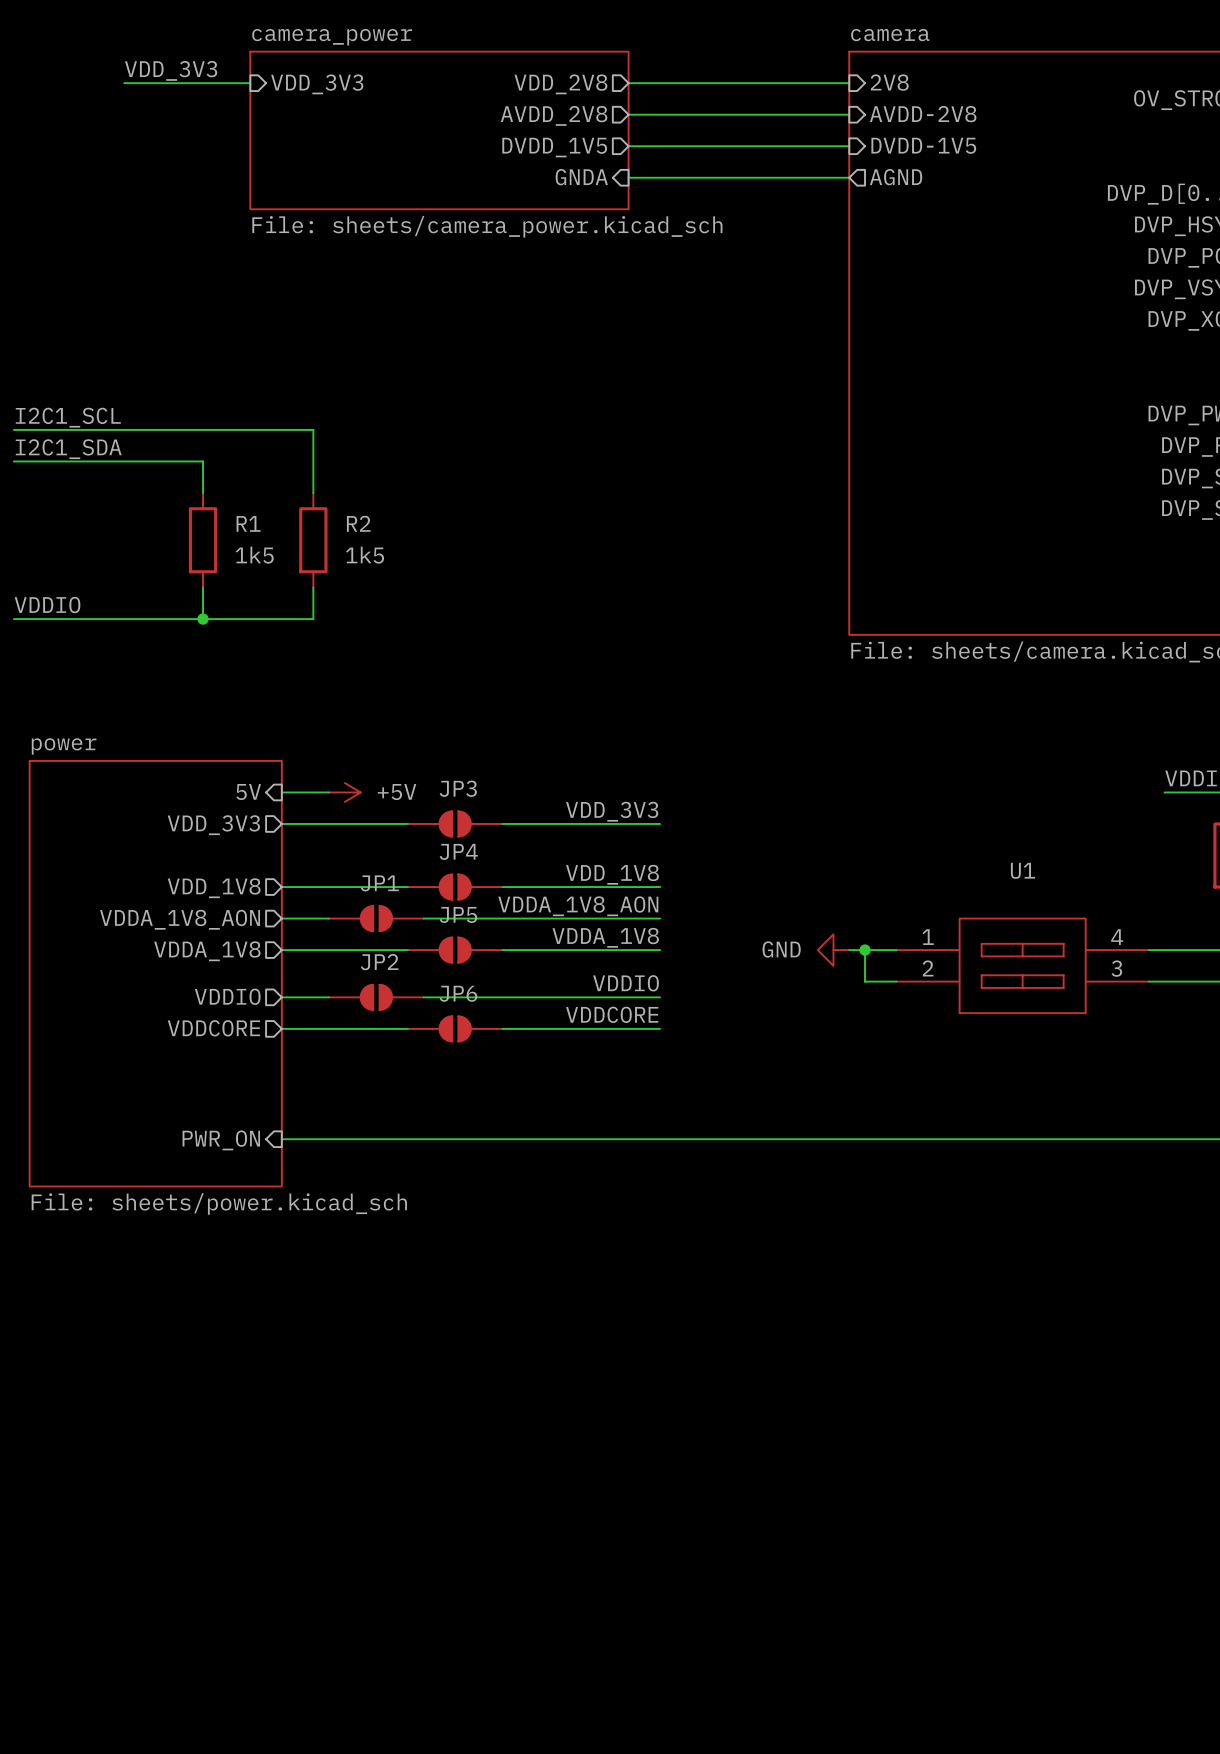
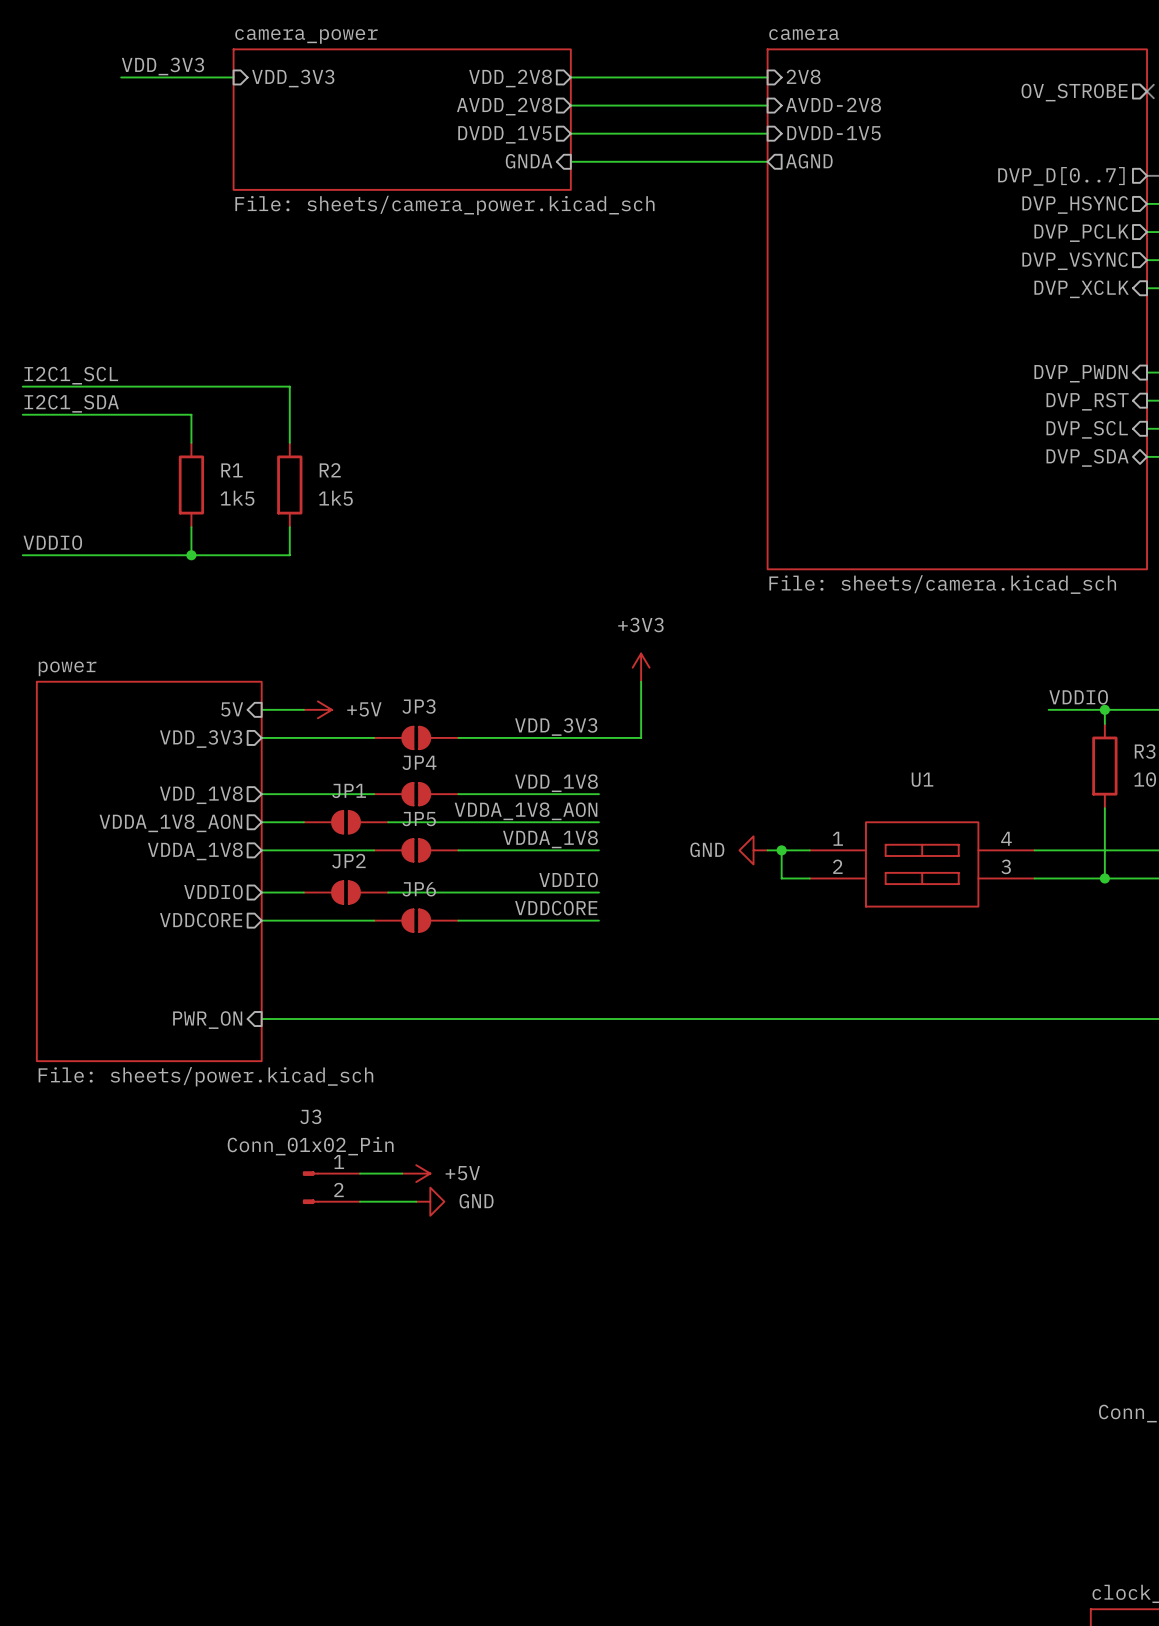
power symbol: none -> +3V3 (641, 667)
wire: none -> (641, 681) (641, 737) (598, 737)
wire: none -> (360, 1173) (402, 1173)
power symbol: none -> +5V (416, 1173)
J3: none -> Conn_01x02_Pin (331, 1187)
wire: none -> (360, 1201) (416, 1201)
power symbol: none -> GND (430, 1201)

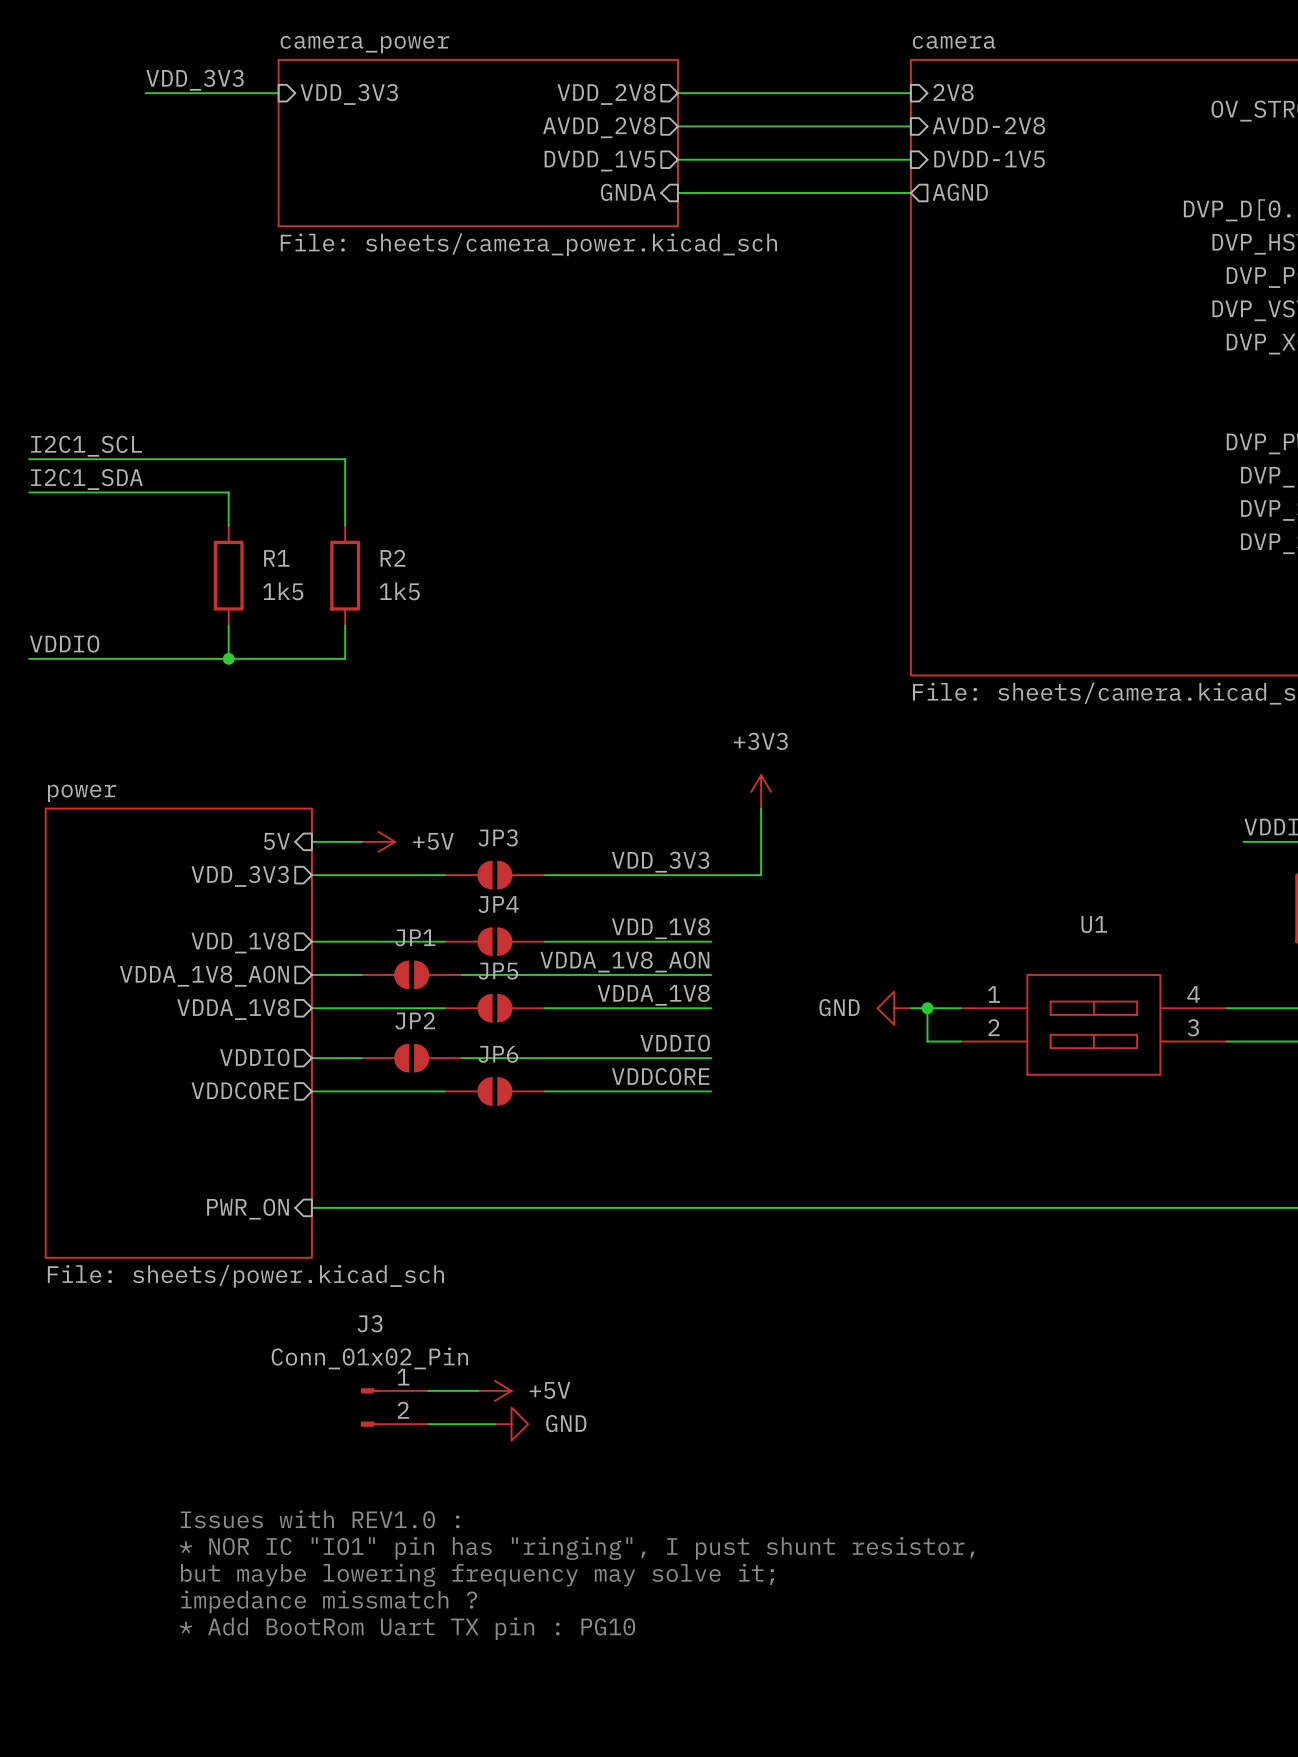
text: none -> Issues with REV1.0 : (320, 1519)
text: none -> * NOR IC "IO1" pin has "ringing", I pust shunt resistor, (577, 1548)
text: none -> but maybe lowering frequency may solve it; (477, 1575)
text: none -> impedance missmatch ? (329, 1601)
text: none -> * Add BootRom Uart TX pin : PG10 (407, 1628)

